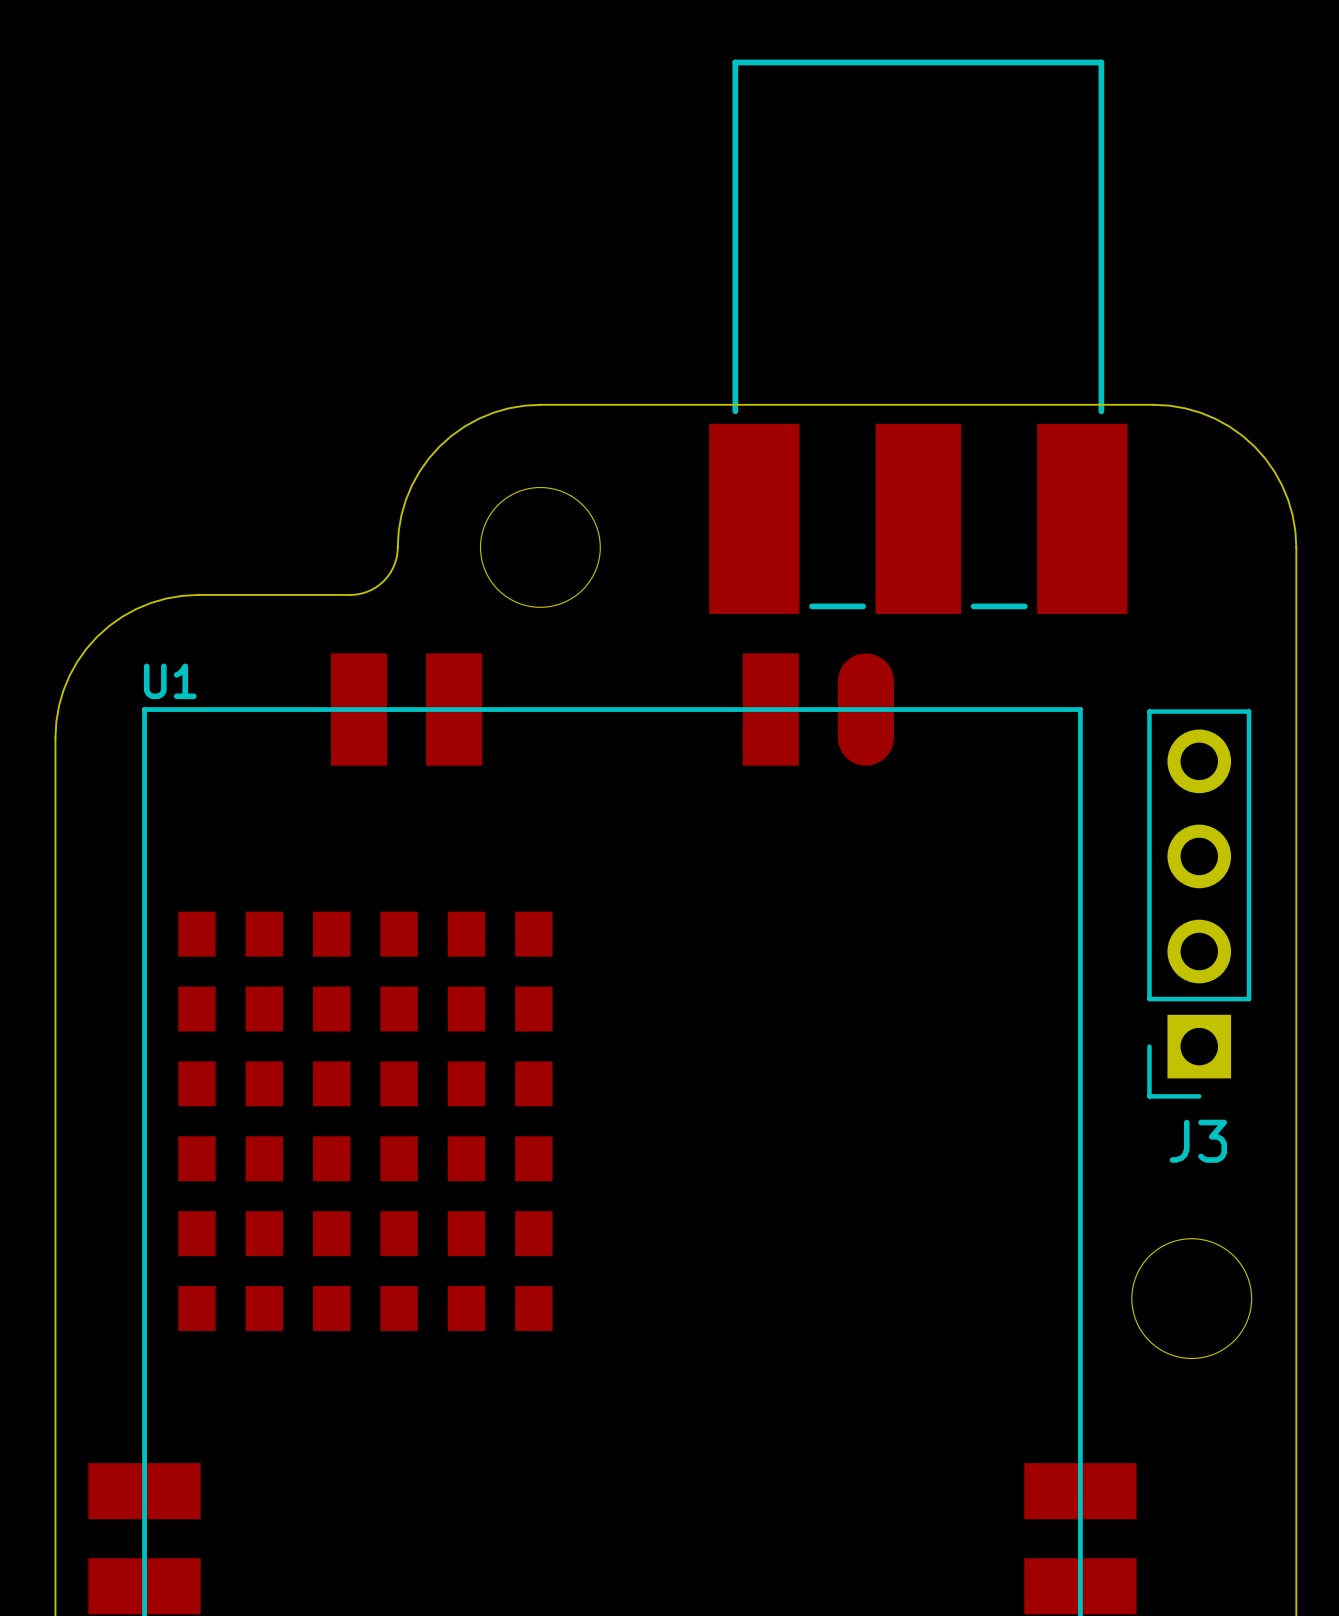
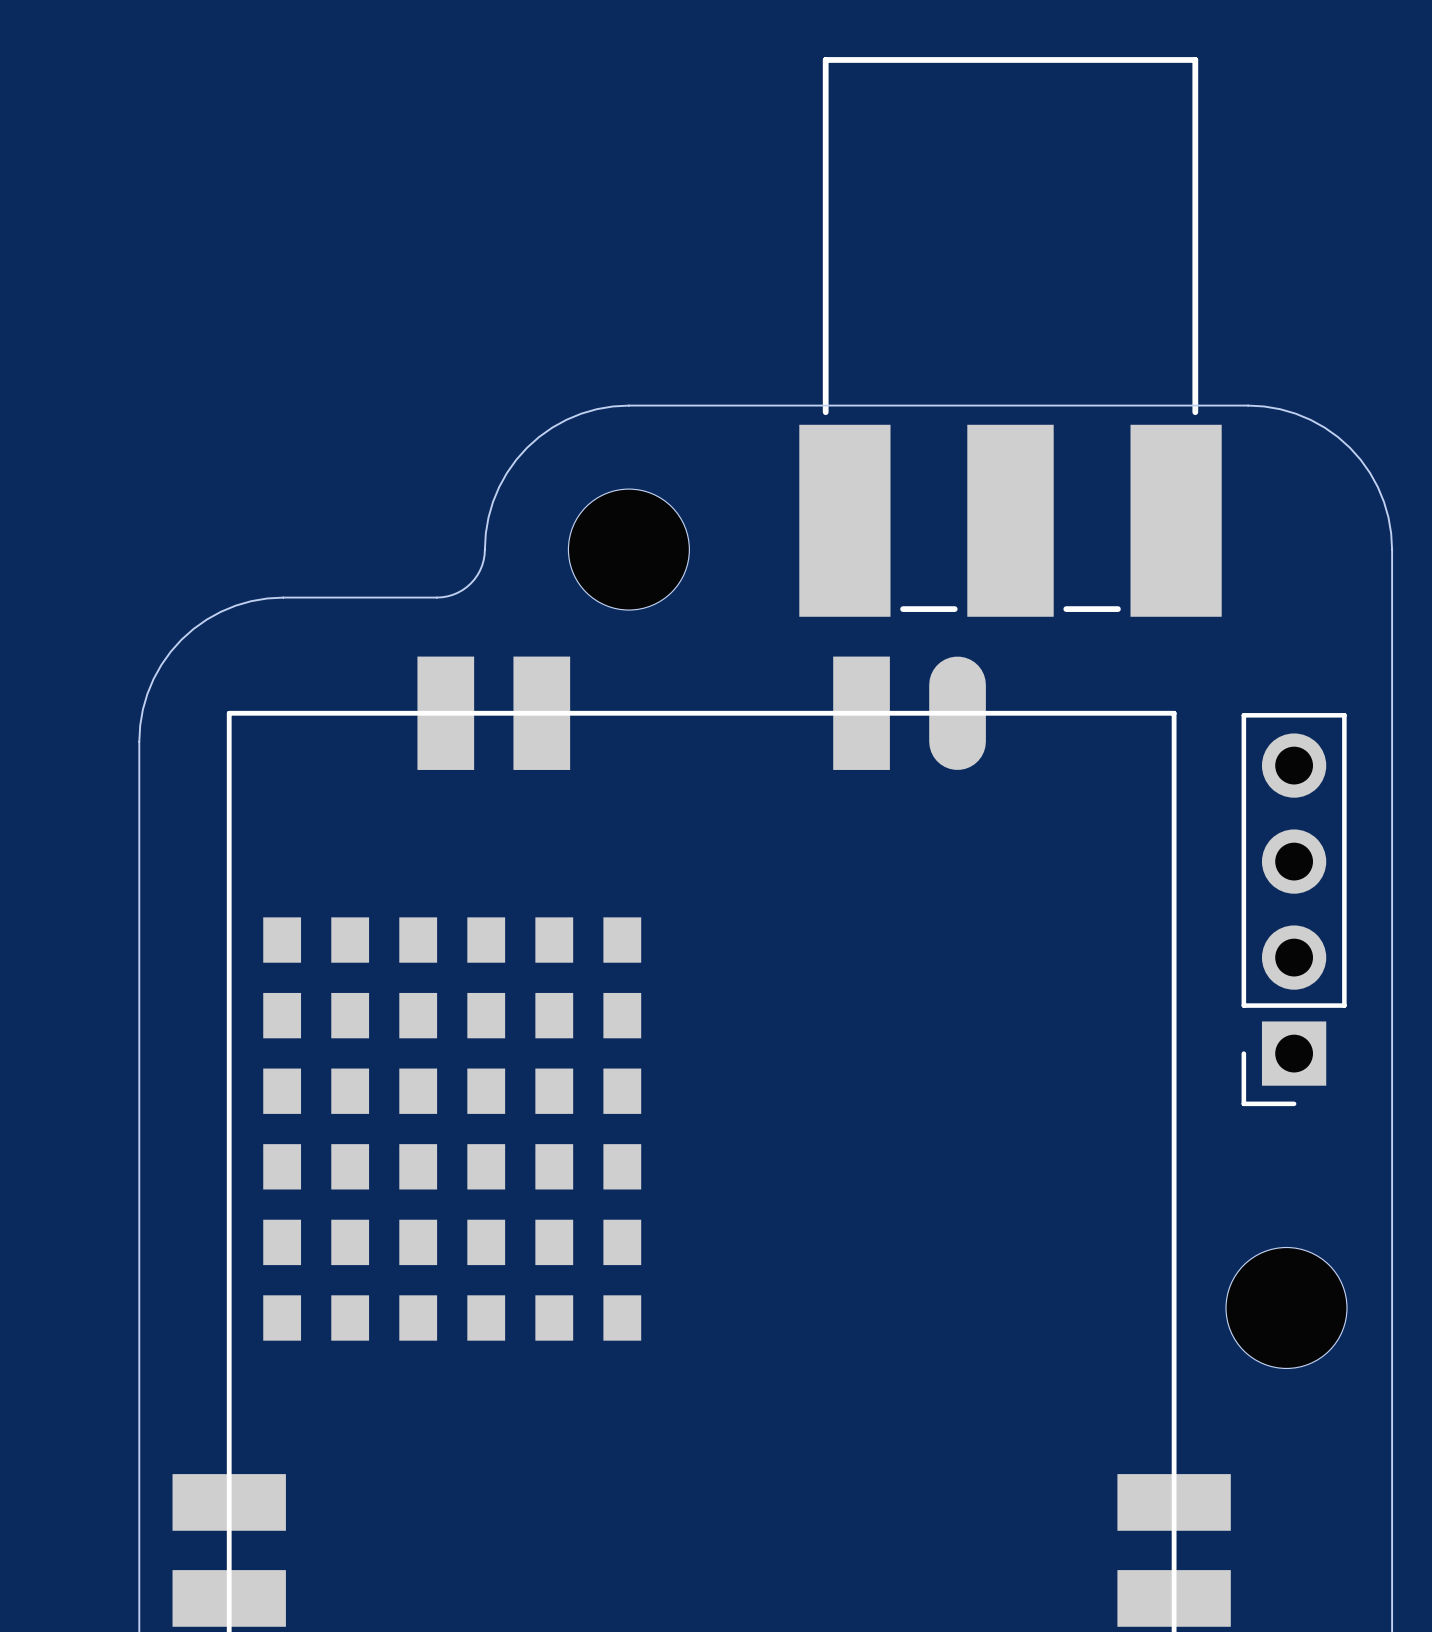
U1 name: U1 (170, 681) -> none
J3 name: J3 (1198, 1141) -> none

